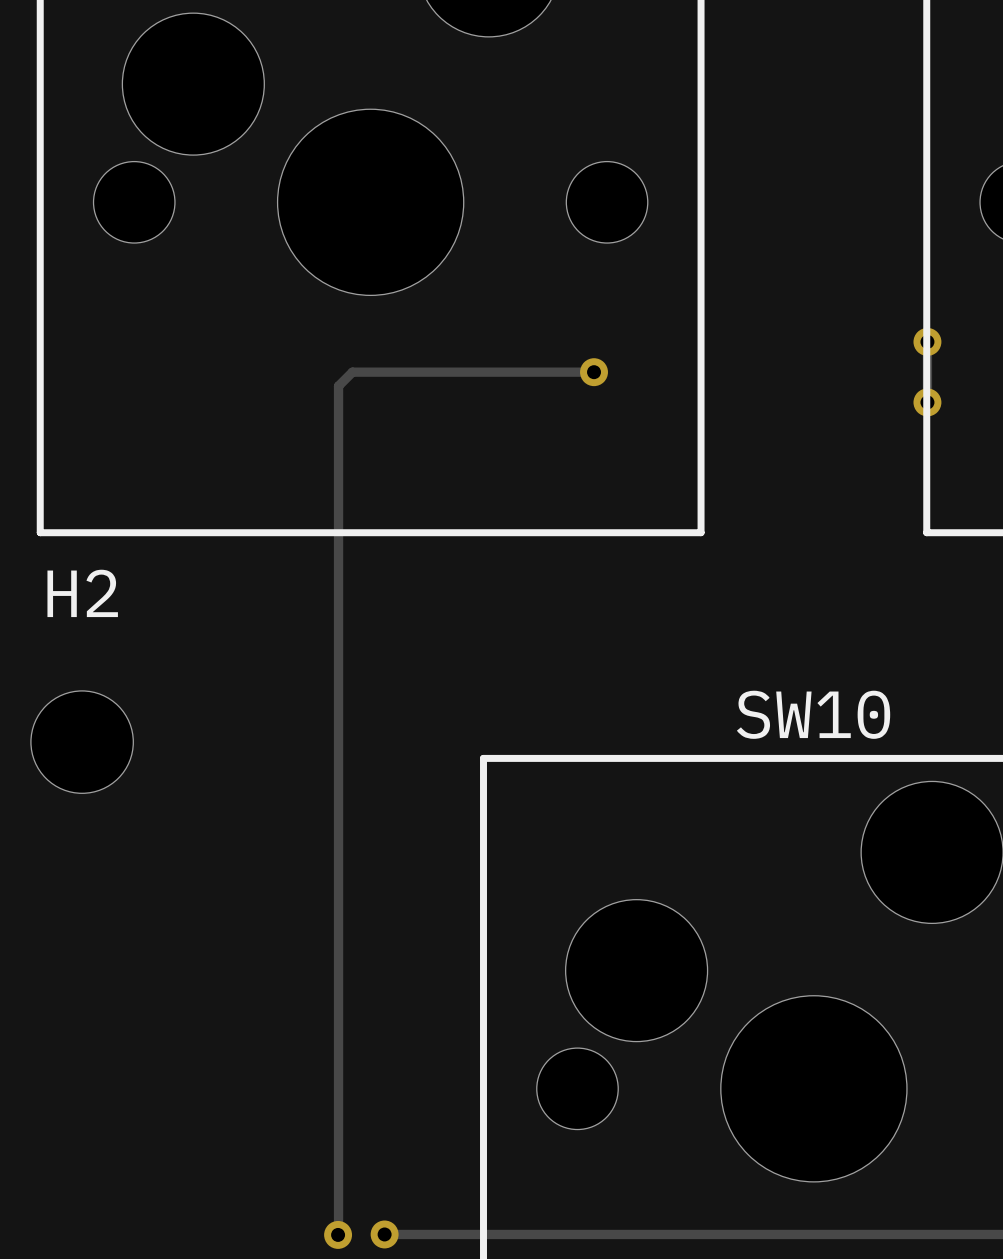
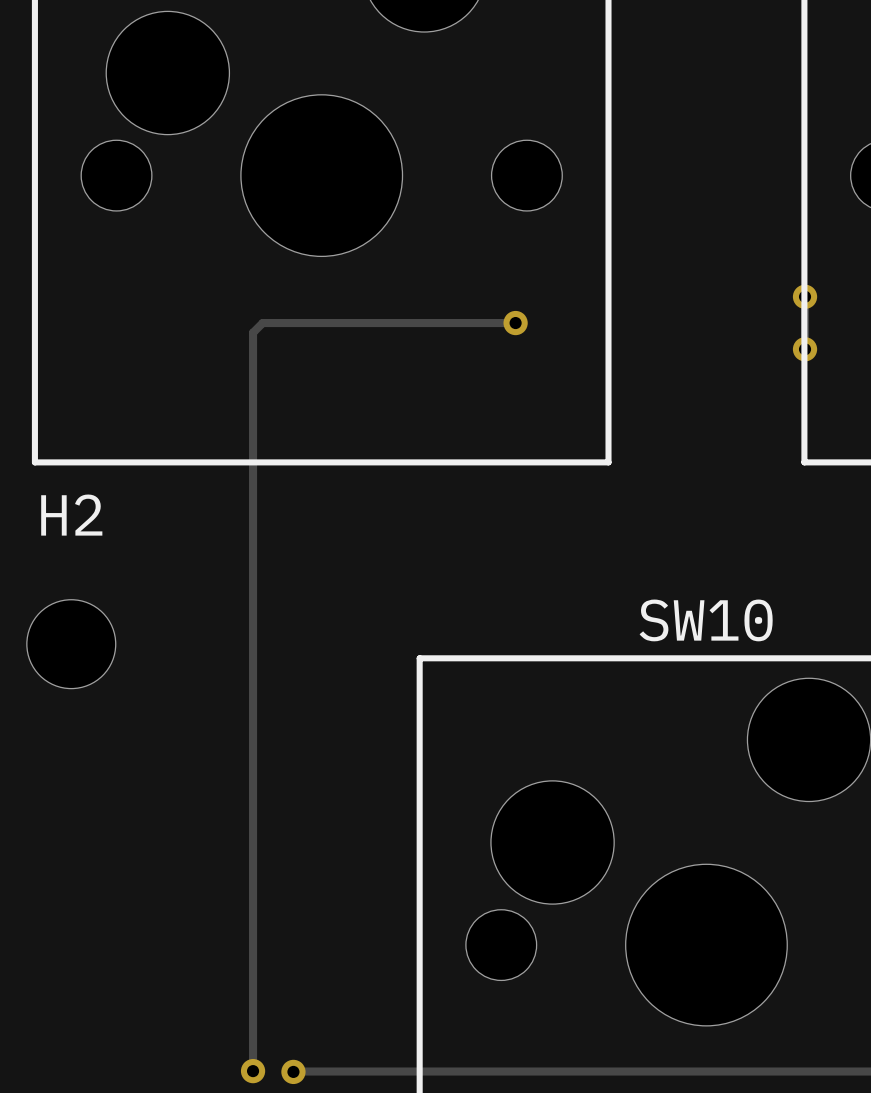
track: (352, 372) (338, 386) (338, 1234) -> (305, 323) (262, 323) (253, 332) (253, 1071)
via: none -> (253, 1071)
track: none -> (293, 1071) (333, 1071)
via: (384, 1234) -> none

